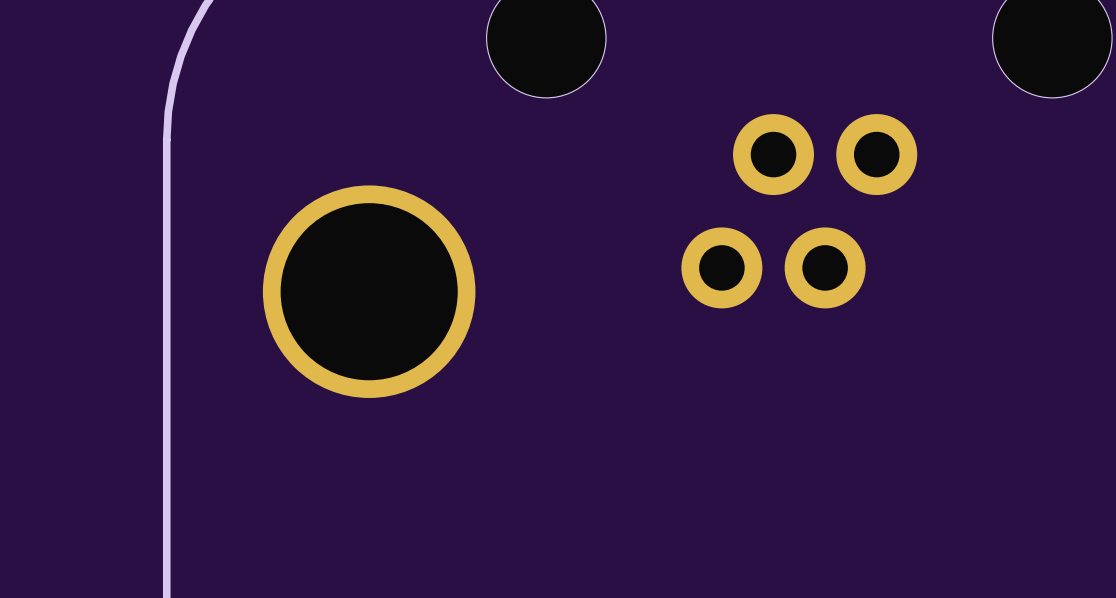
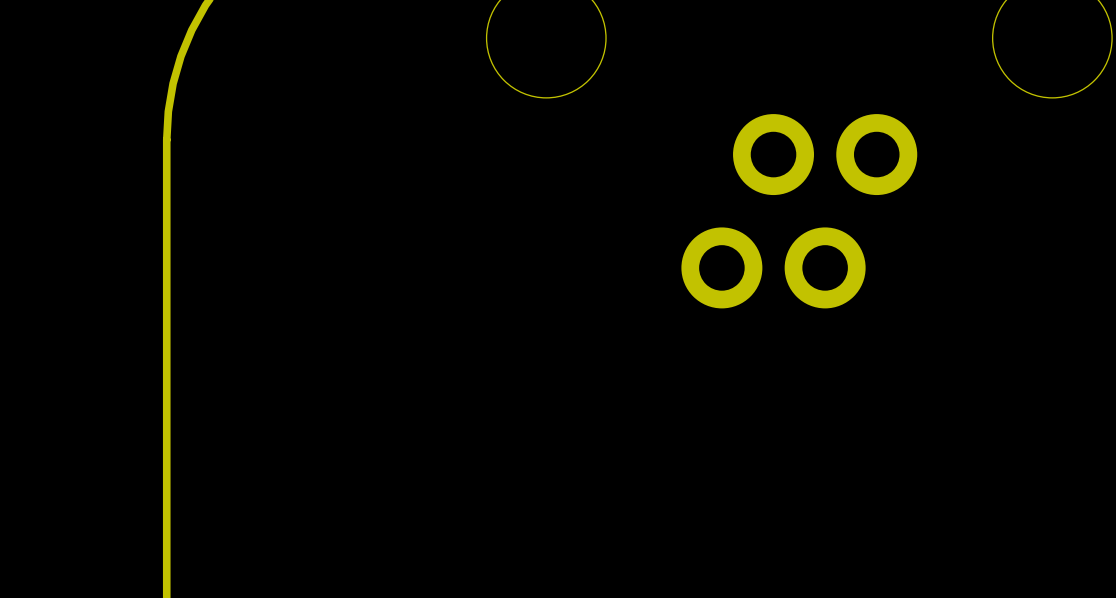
part: (369, 291) -> none

